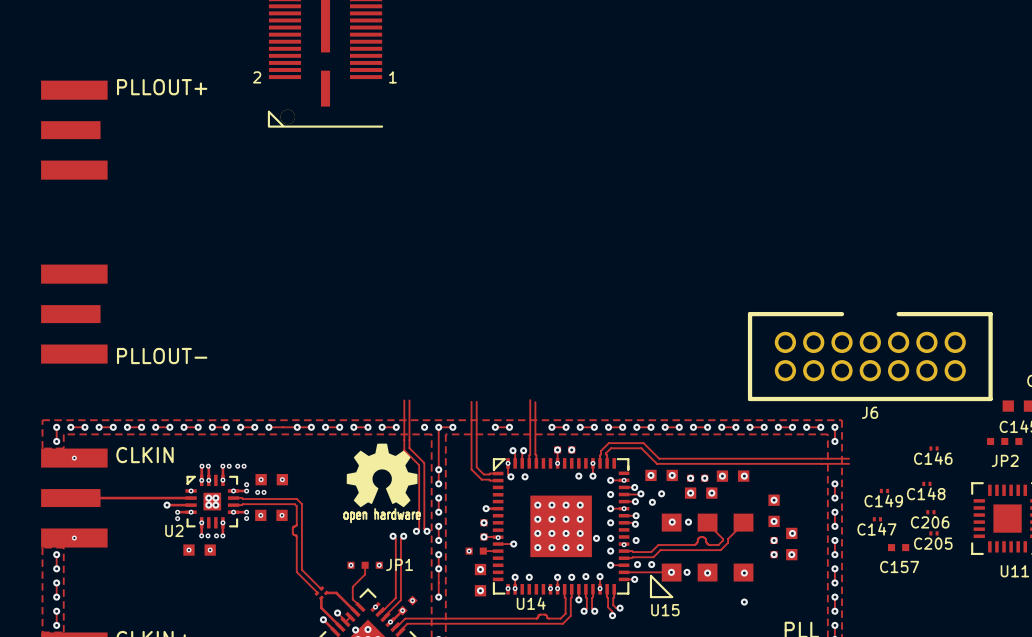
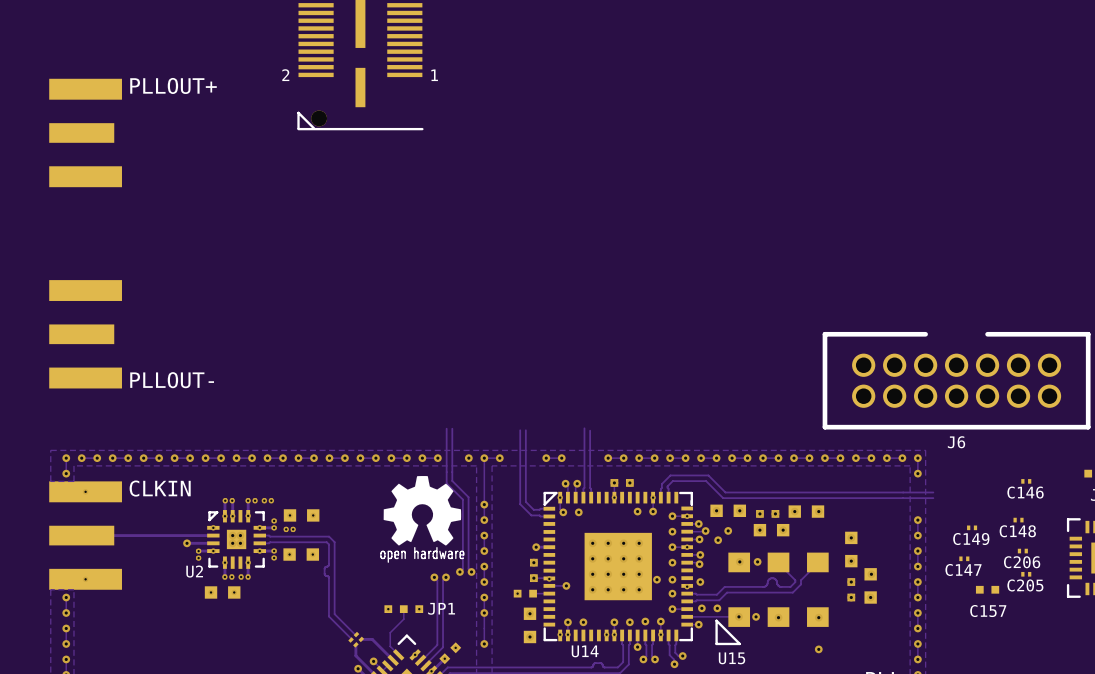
track: (283, 427) (297, 427) -> none
via: none -> (313, 458)

